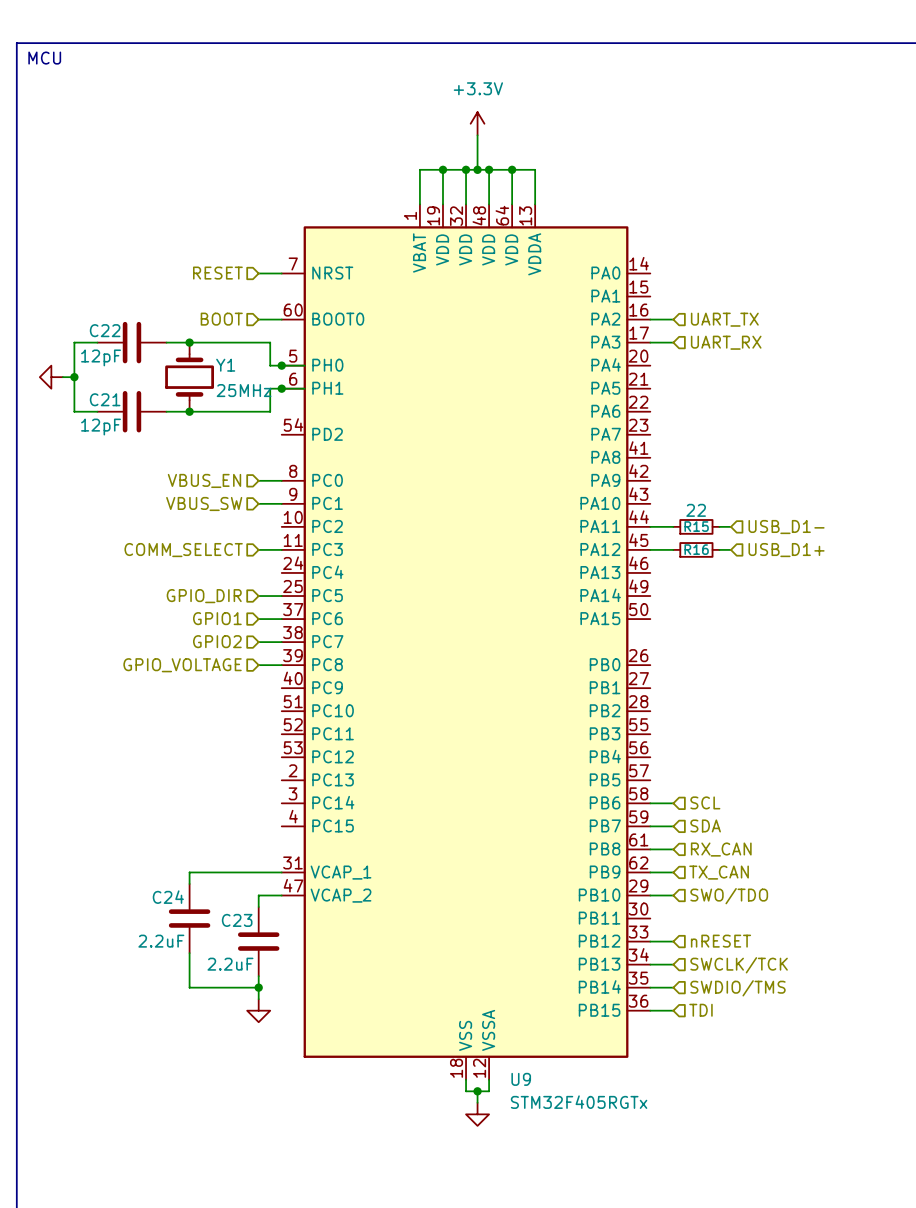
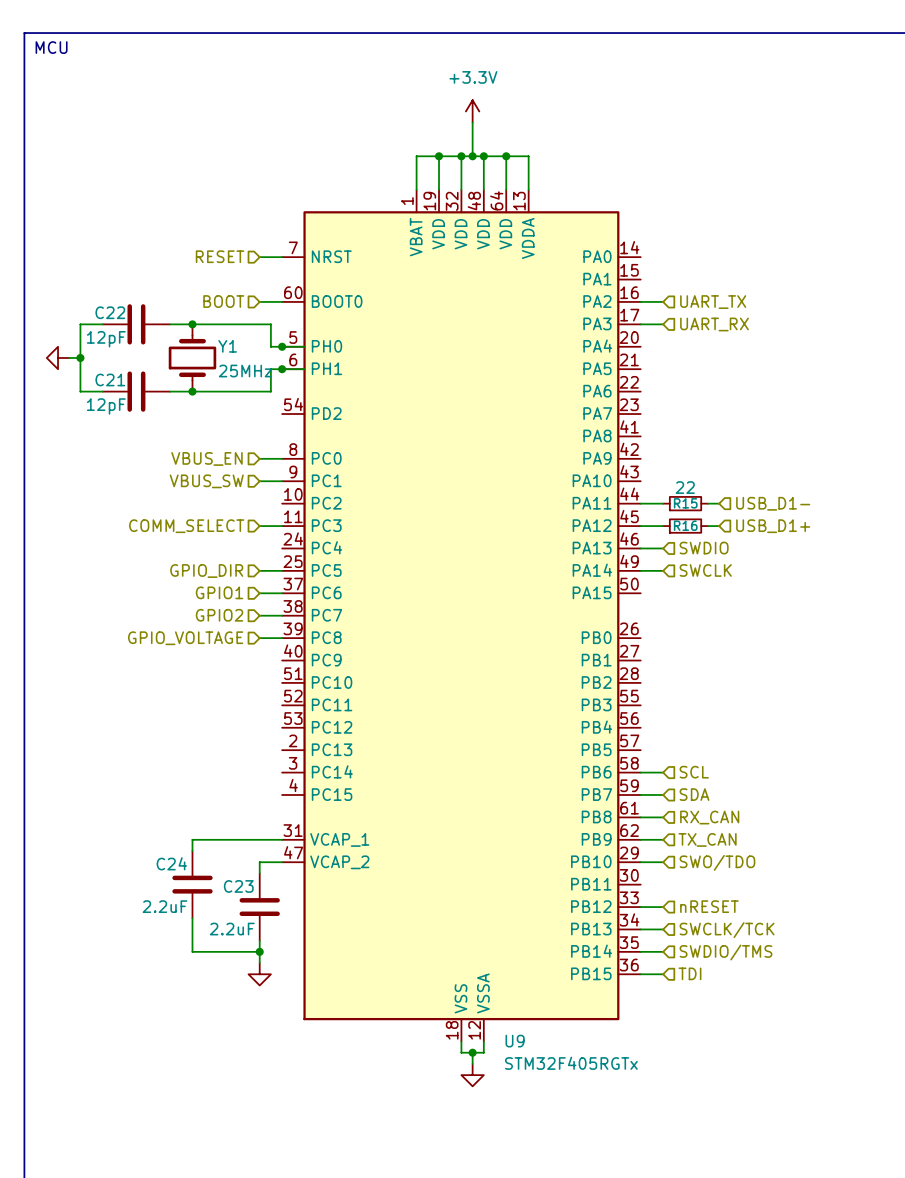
wire: none -> (640, 548) (663, 548)
hierarchical label: none -> SWDIO (704, 548)
hierarchical label: none -> SWCLK (705, 570)
wire: none -> (640, 570) (663, 570)

